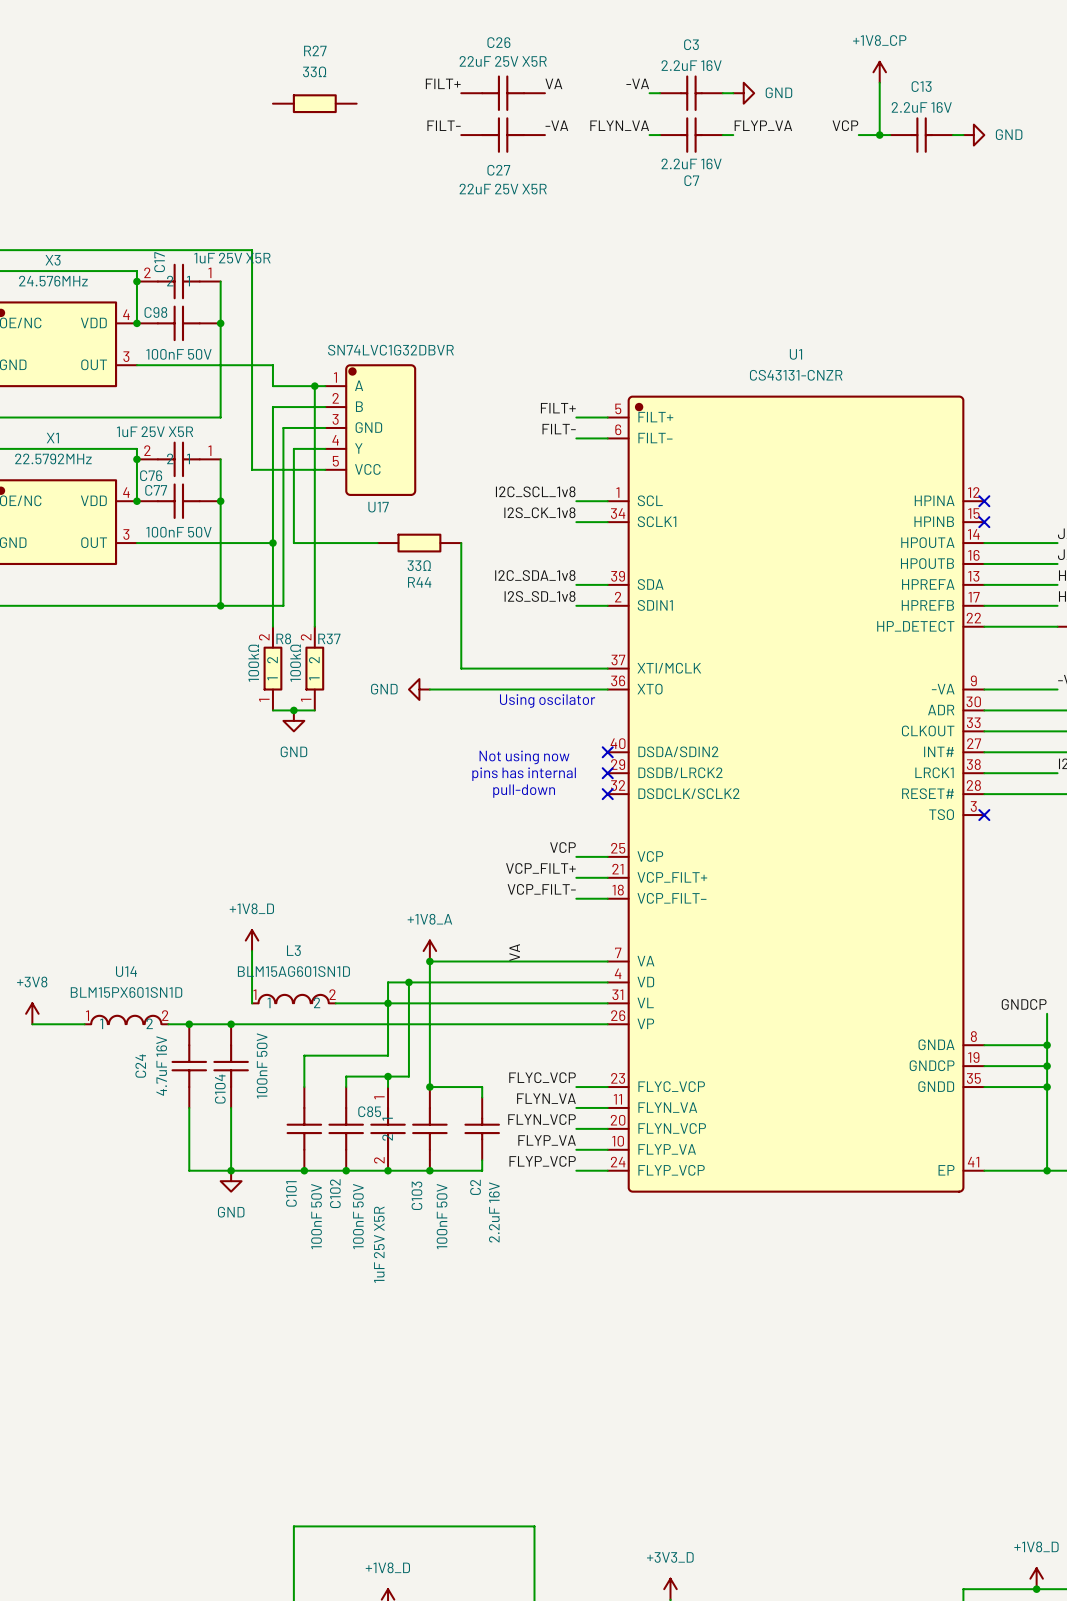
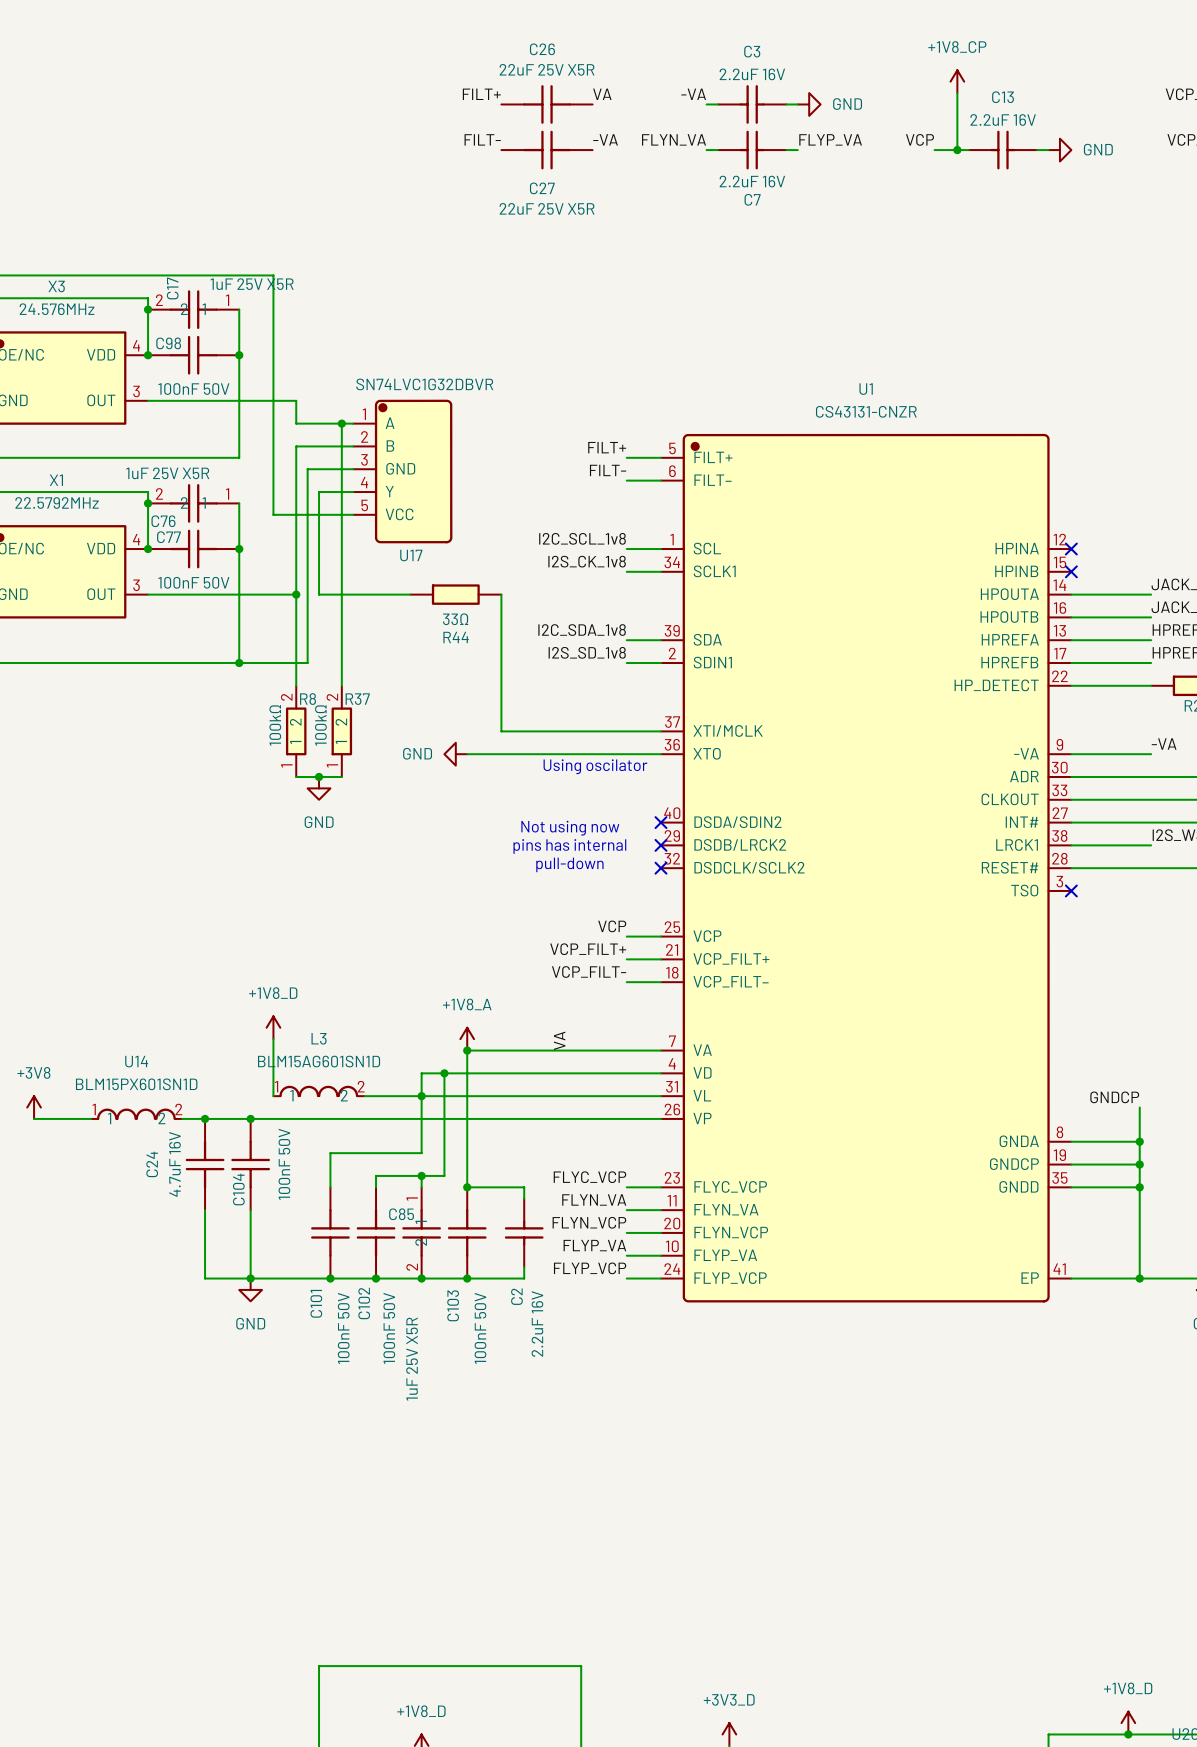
R27: 33Ω (314, 103) -> none

